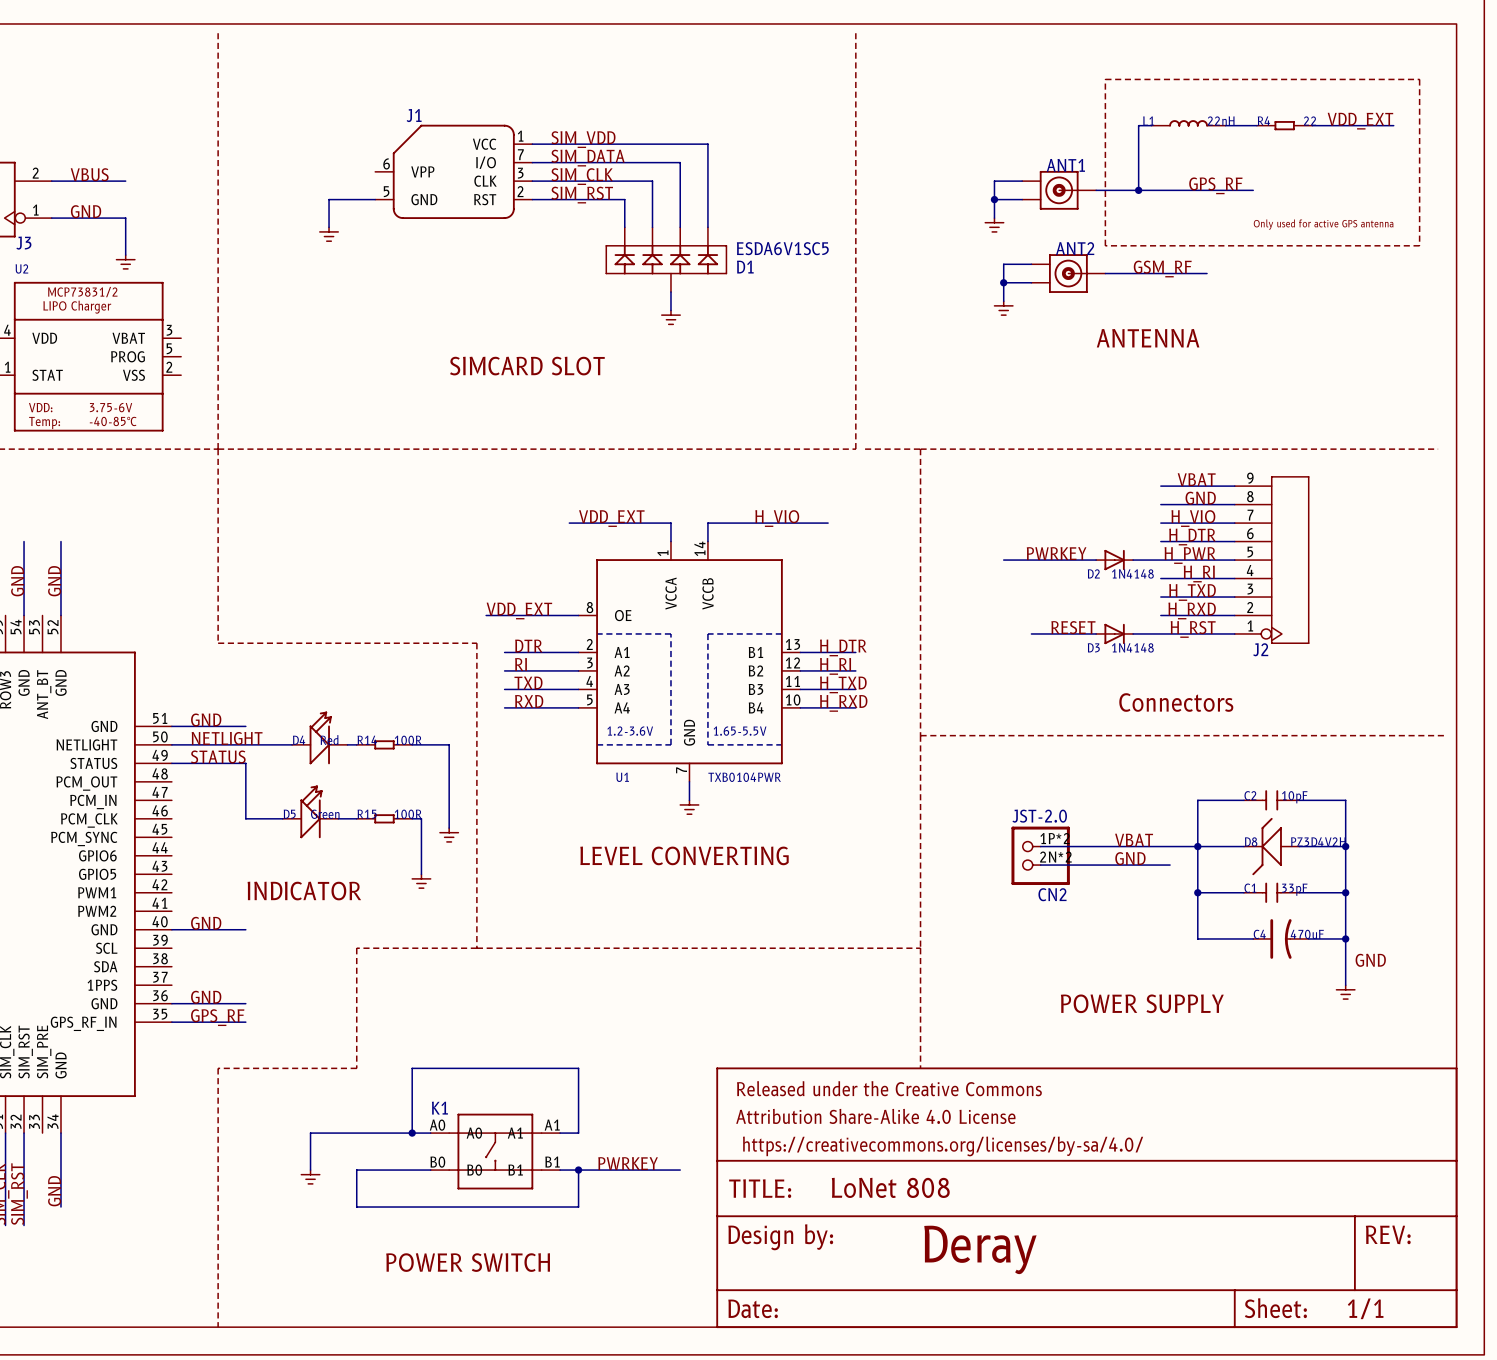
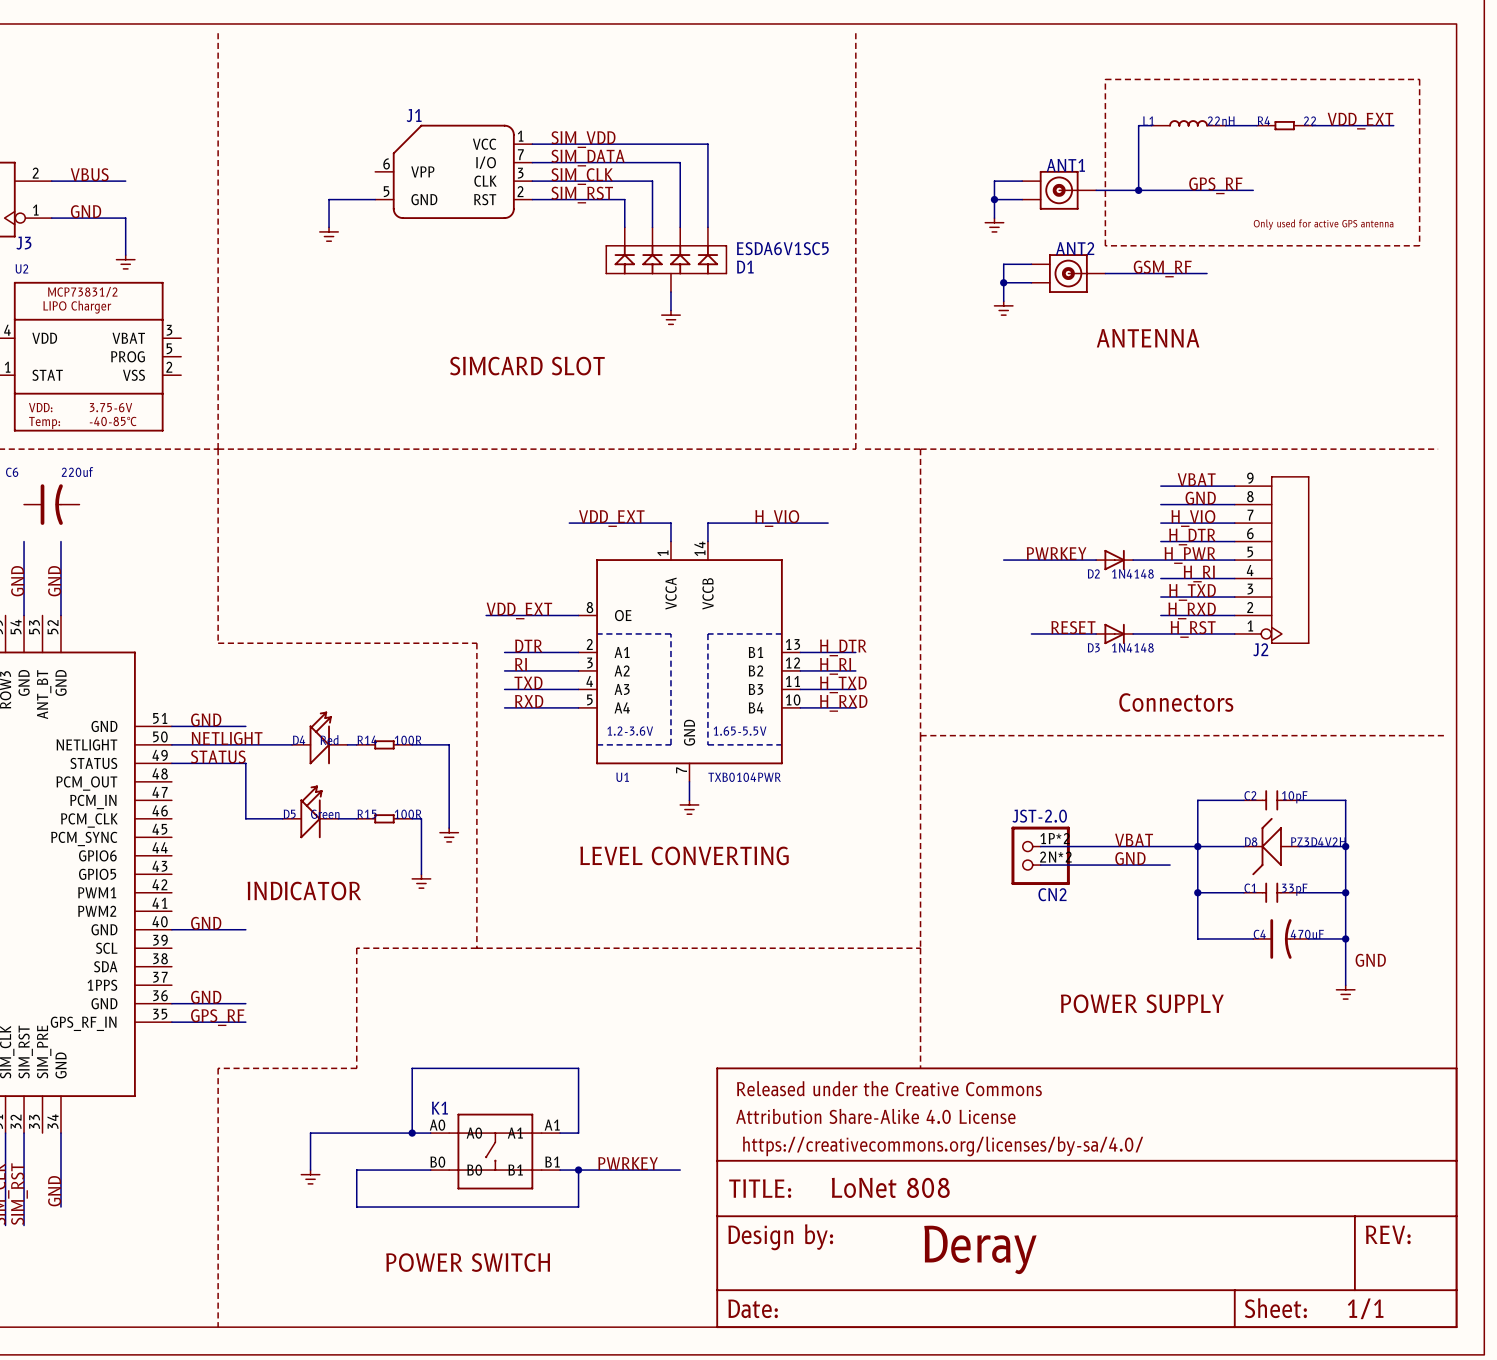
C6: none -> 220uf (51, 504)

